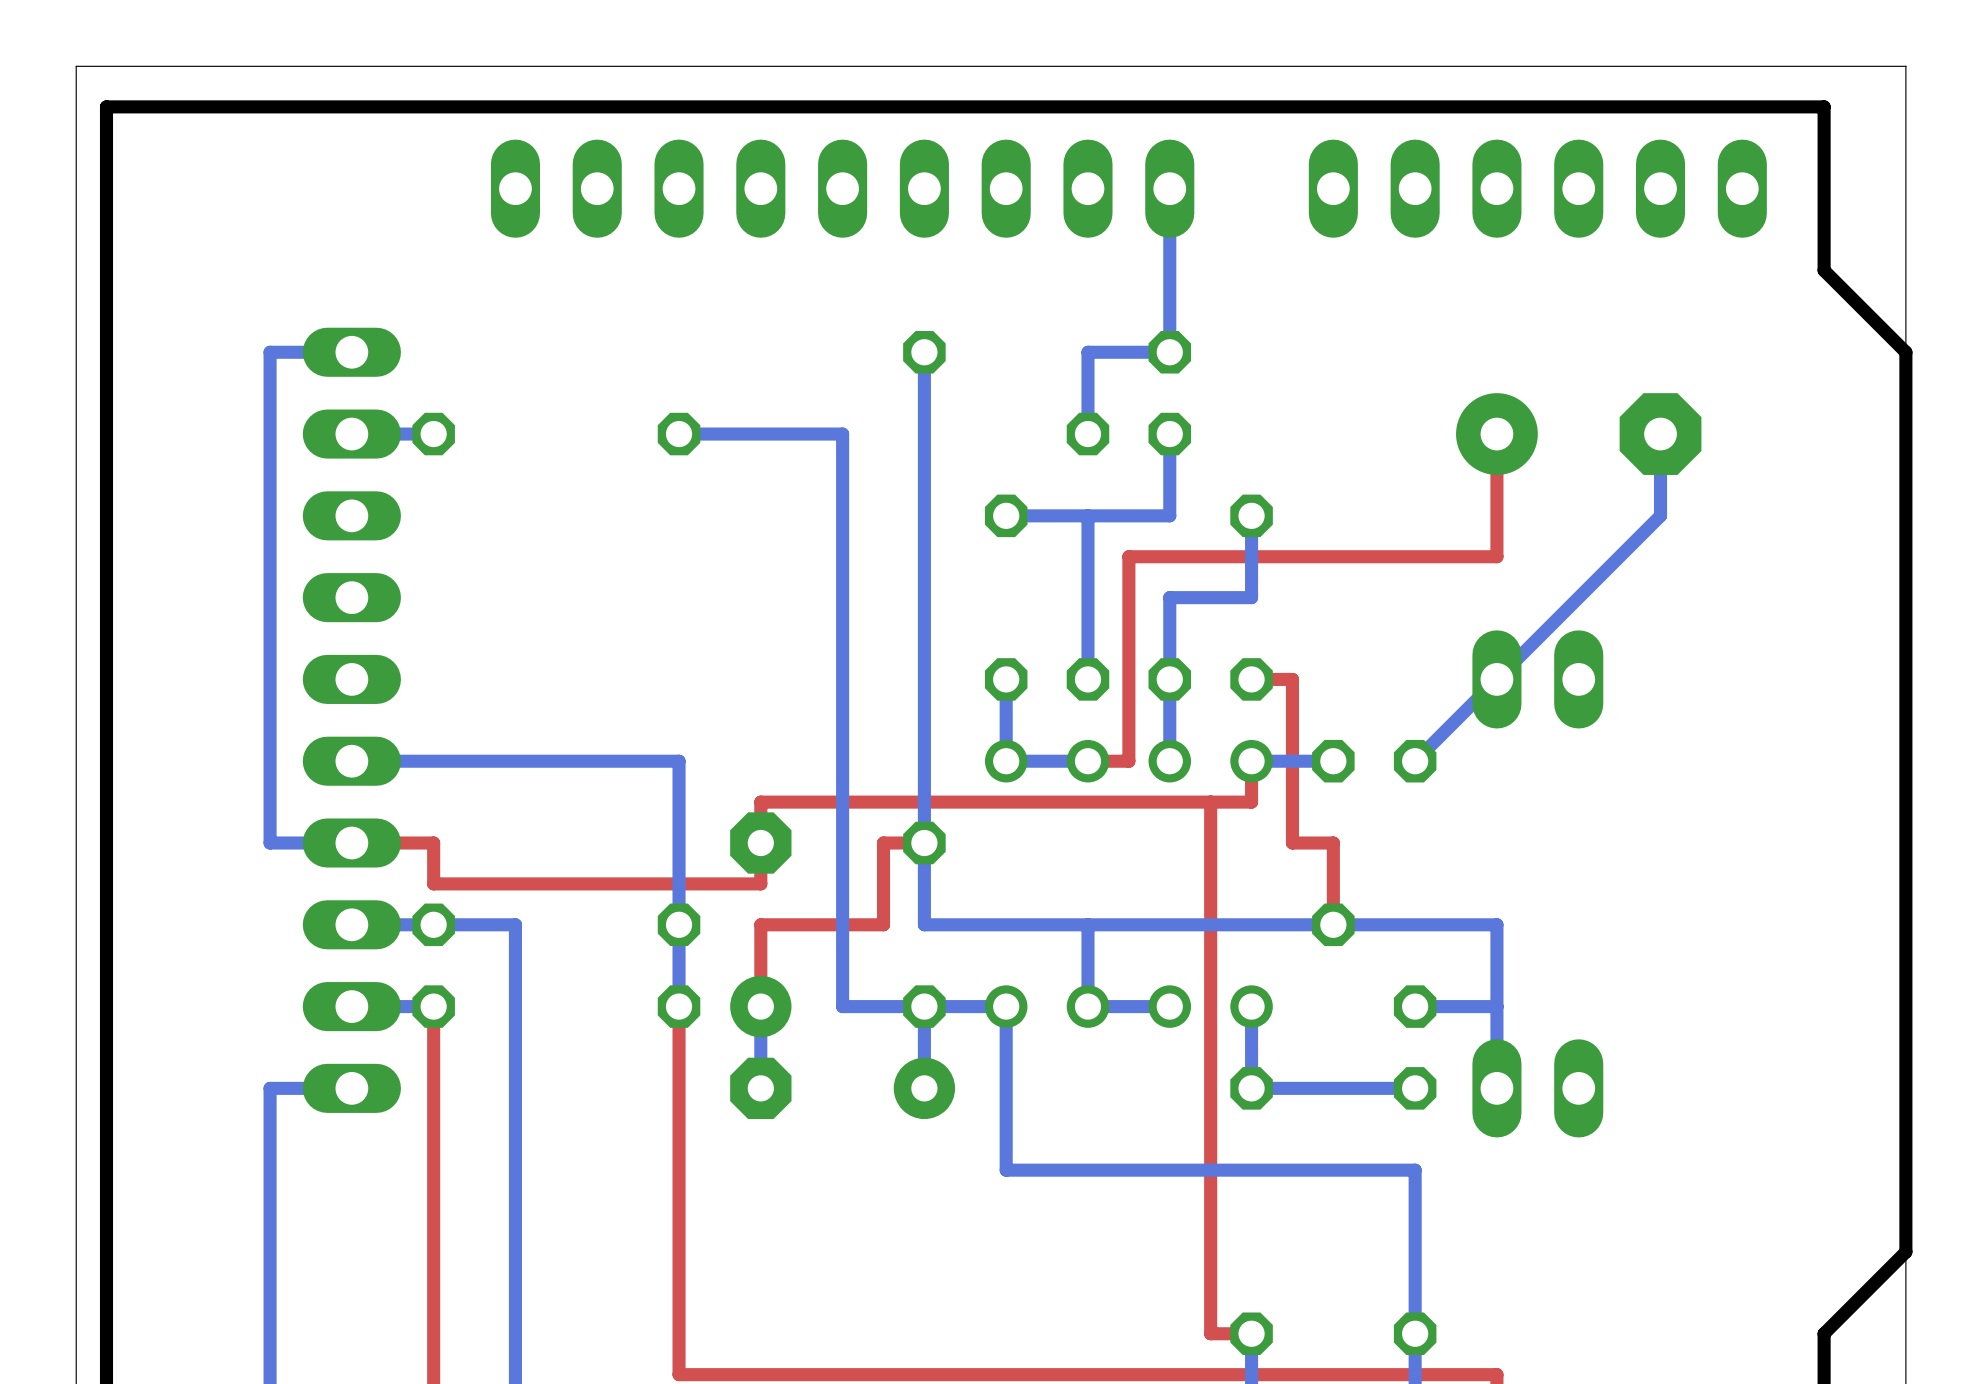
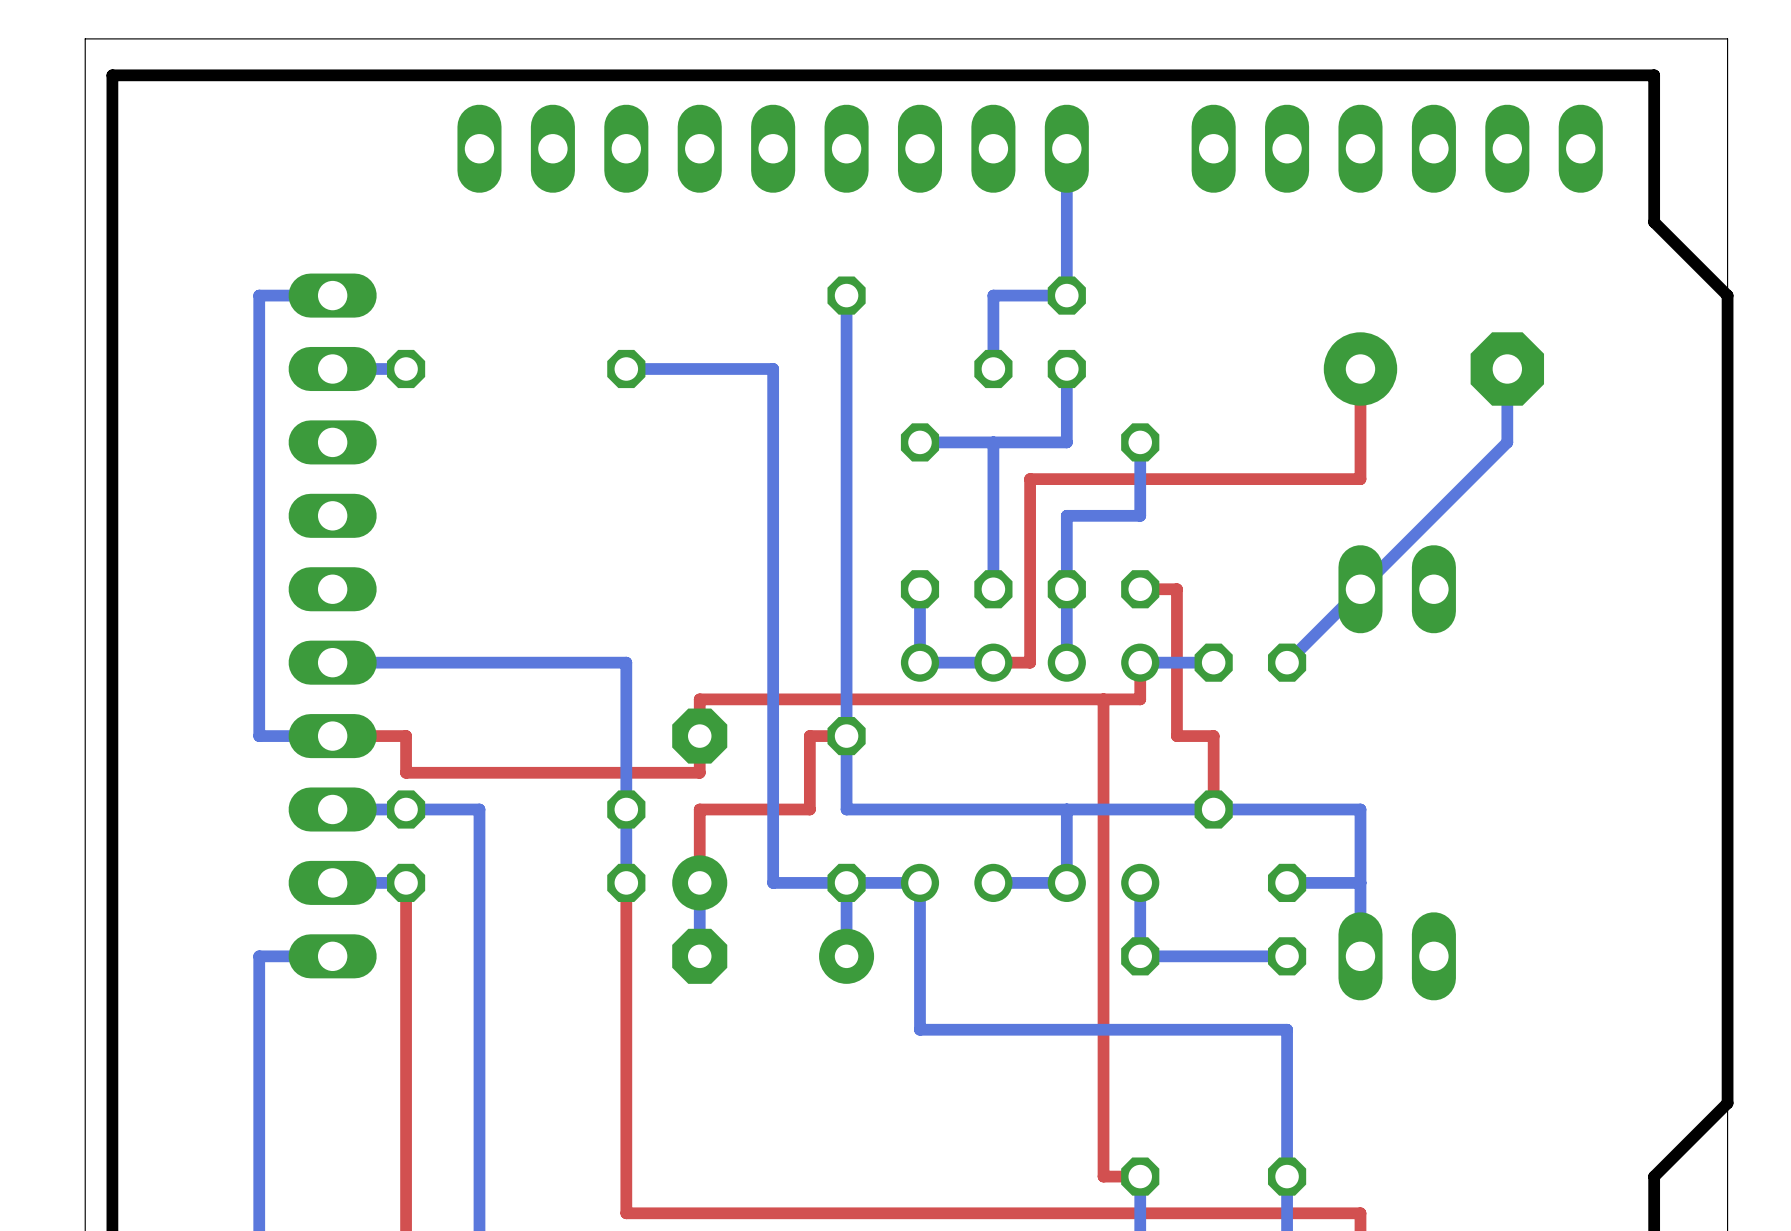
bottom track: (1087, 924) (1087, 1006) -> (1066, 809) (1066, 882)

